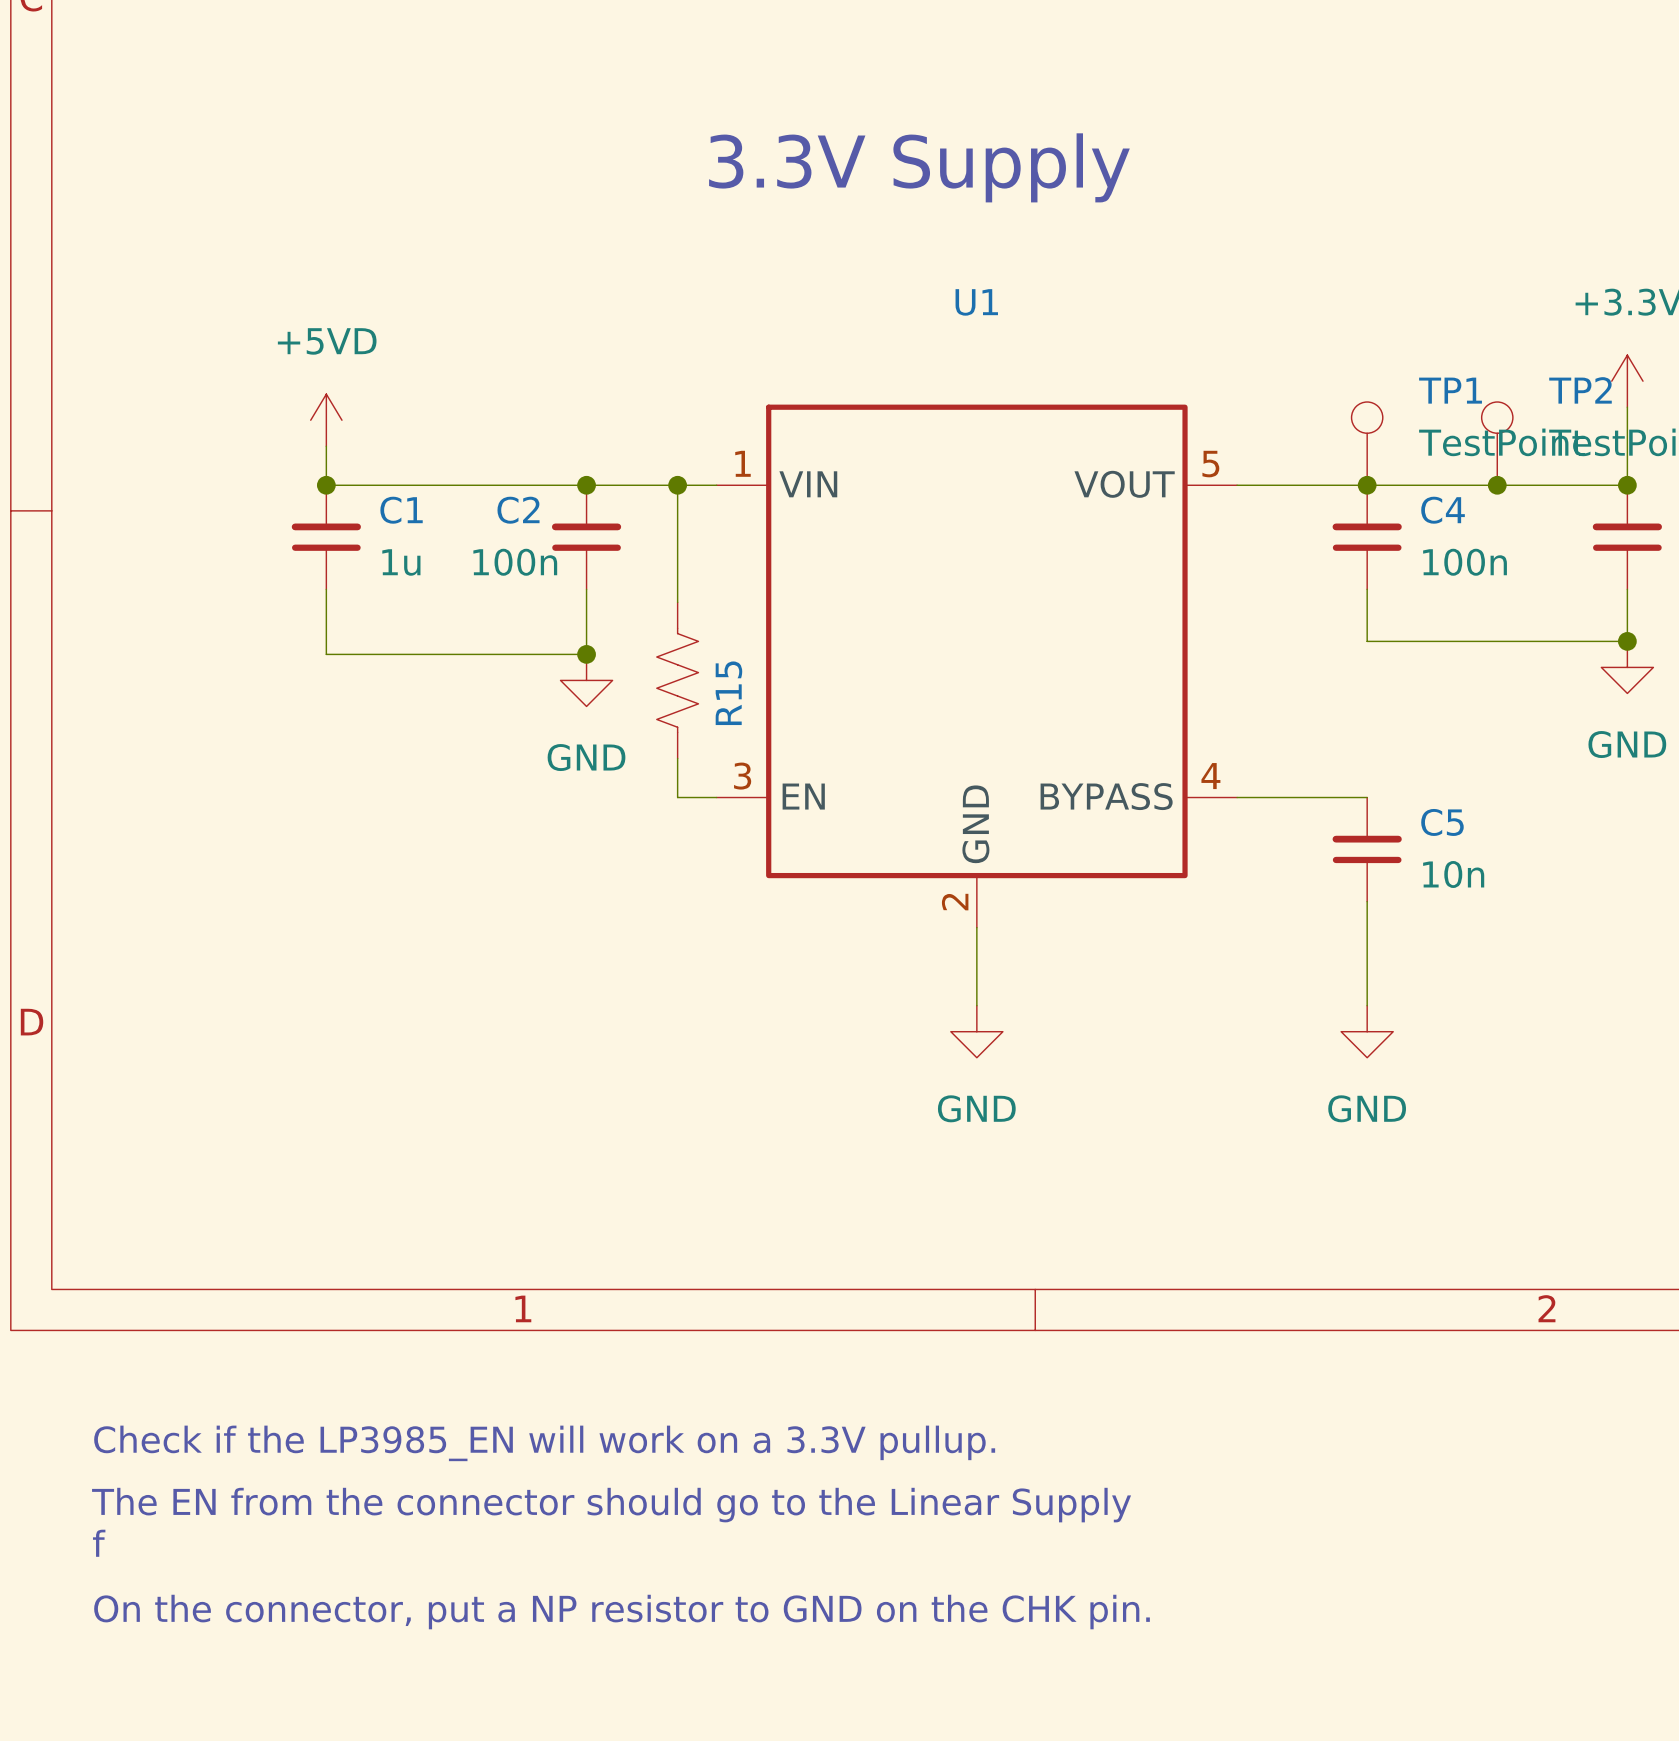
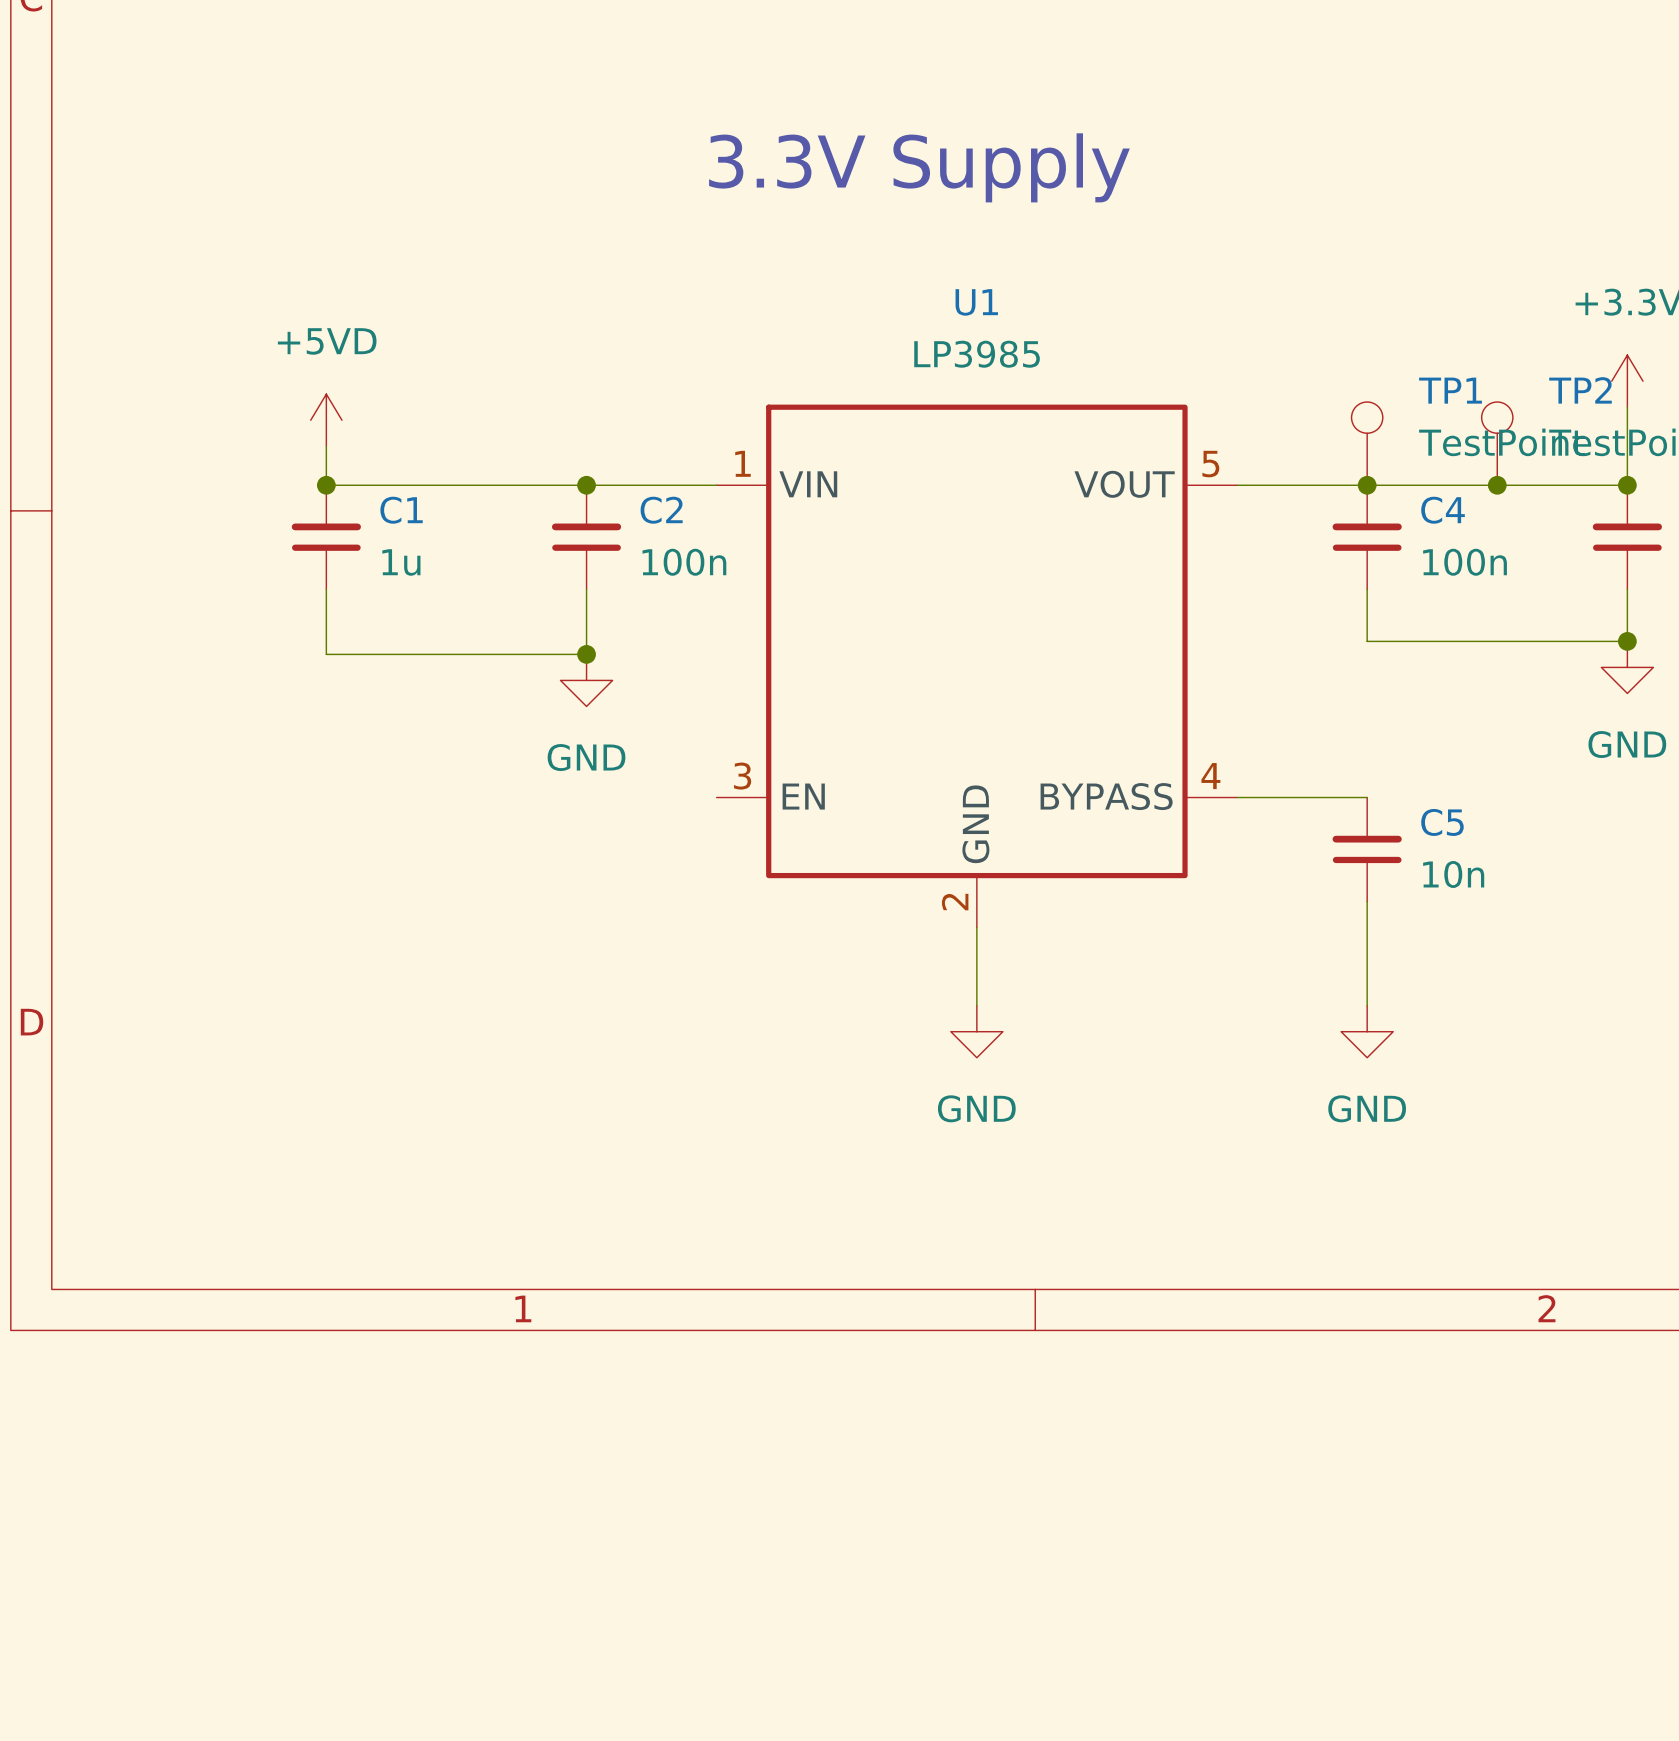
U1 value: none -> LP3985 (977, 354)
wire: (677, 485) (677, 602) -> none
junction: (677, 485) -> none
C2 name position: C2 (518, 510) -> C2 (661, 510)
C2 value position: 100n (515, 562) -> 100n (684, 562)
R15: (677, 680) -> none
wire: (677, 758) (677, 797) (716, 797) -> none
text: Check if the LP3985_EN will work on a 3.3V pullup. (544, 1443) -> none
text: The EN from the connector should go to the Linear Supply (611, 1505) -> none
text: f (99, 1543) -> none
text: On the connector, put a NP resistor to GND on the CHK pin. (622, 1612) -> none

